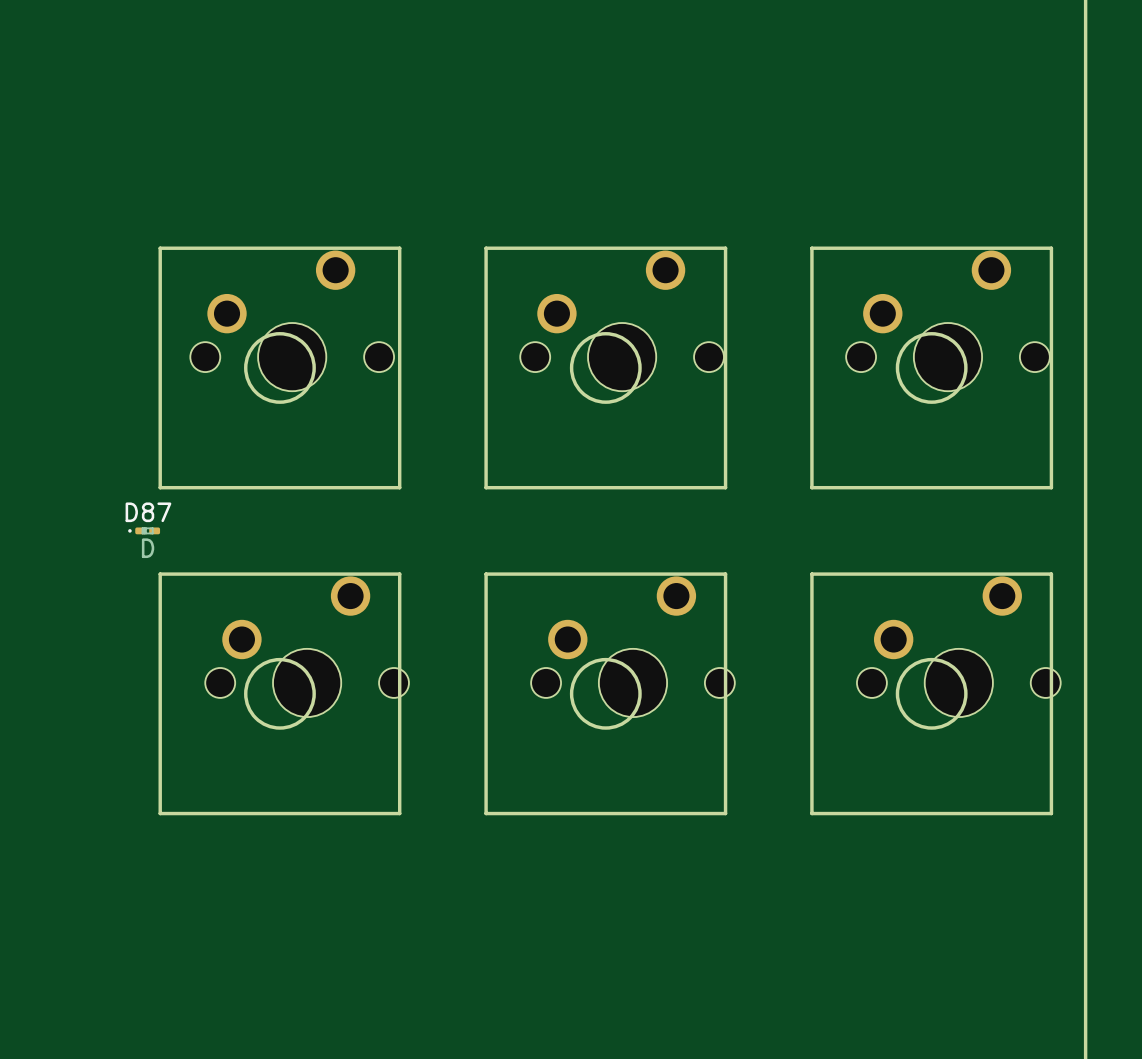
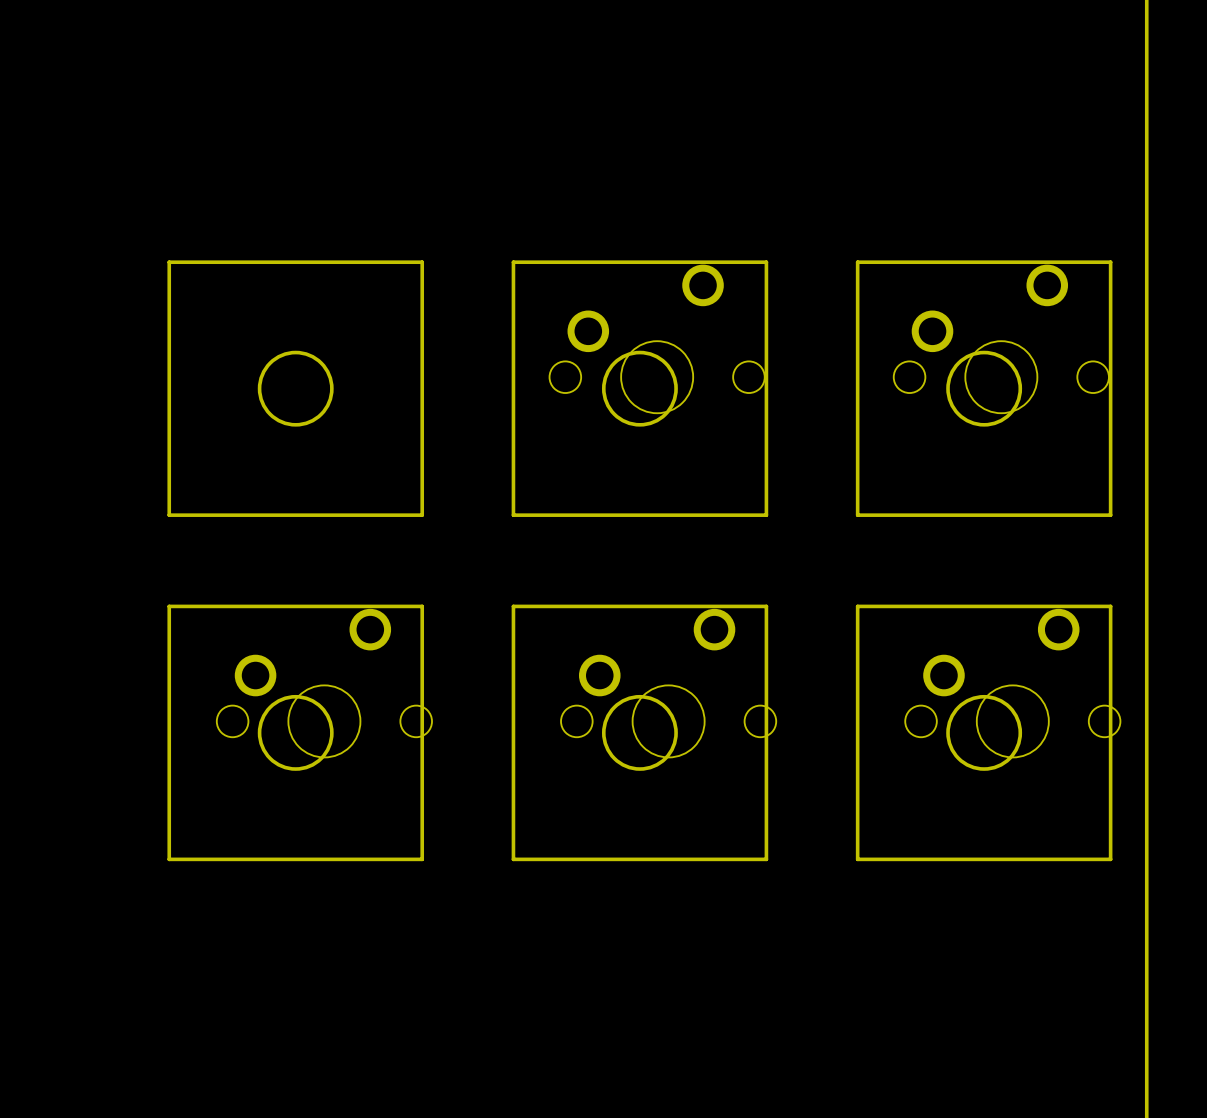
part: (292, 320) -> none
D87: D (144, 530) -> none

